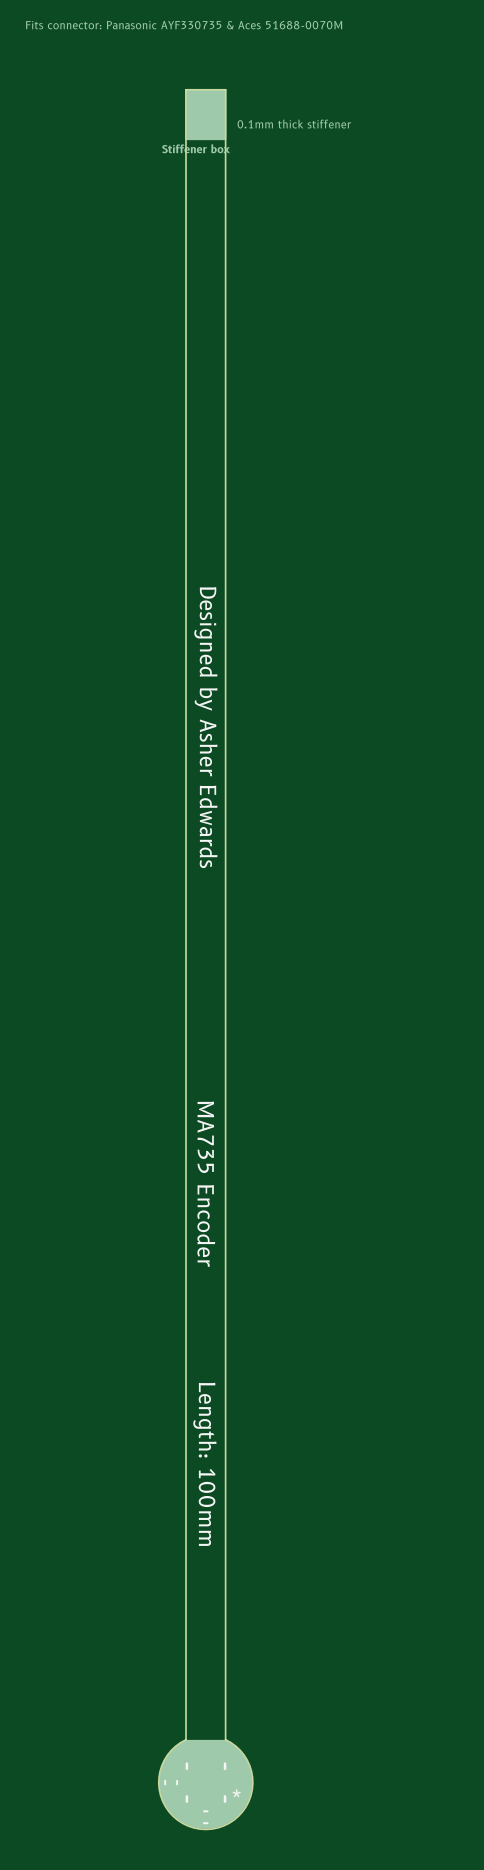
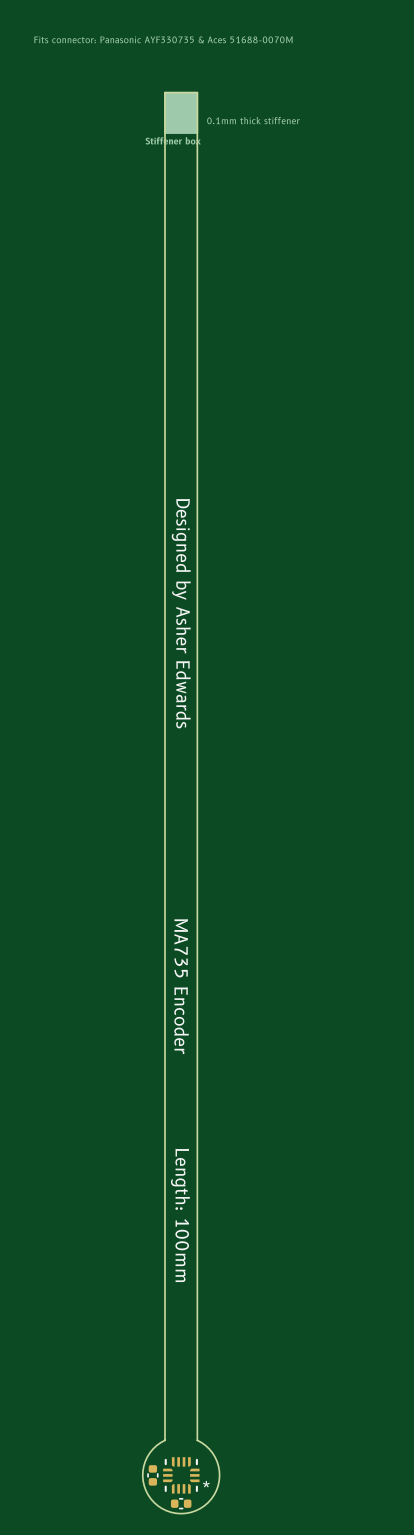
drawing: [159, 1739, 253, 1829] -> none

